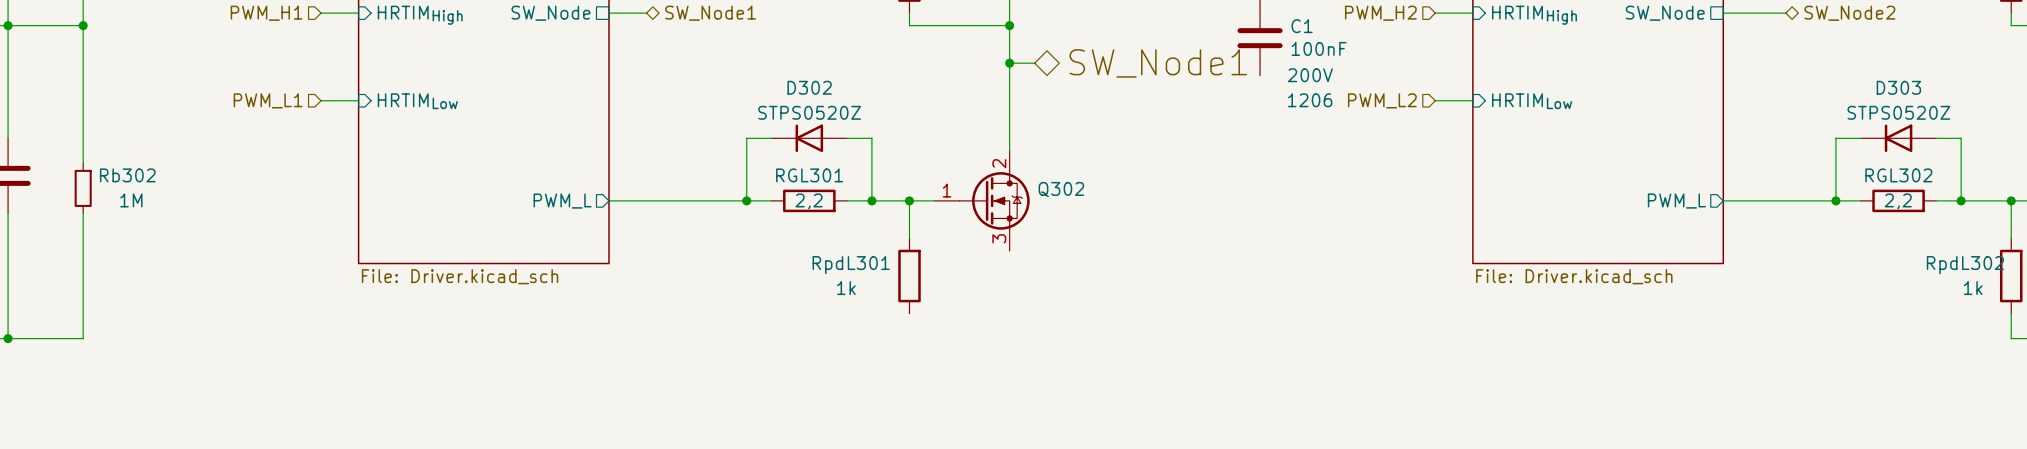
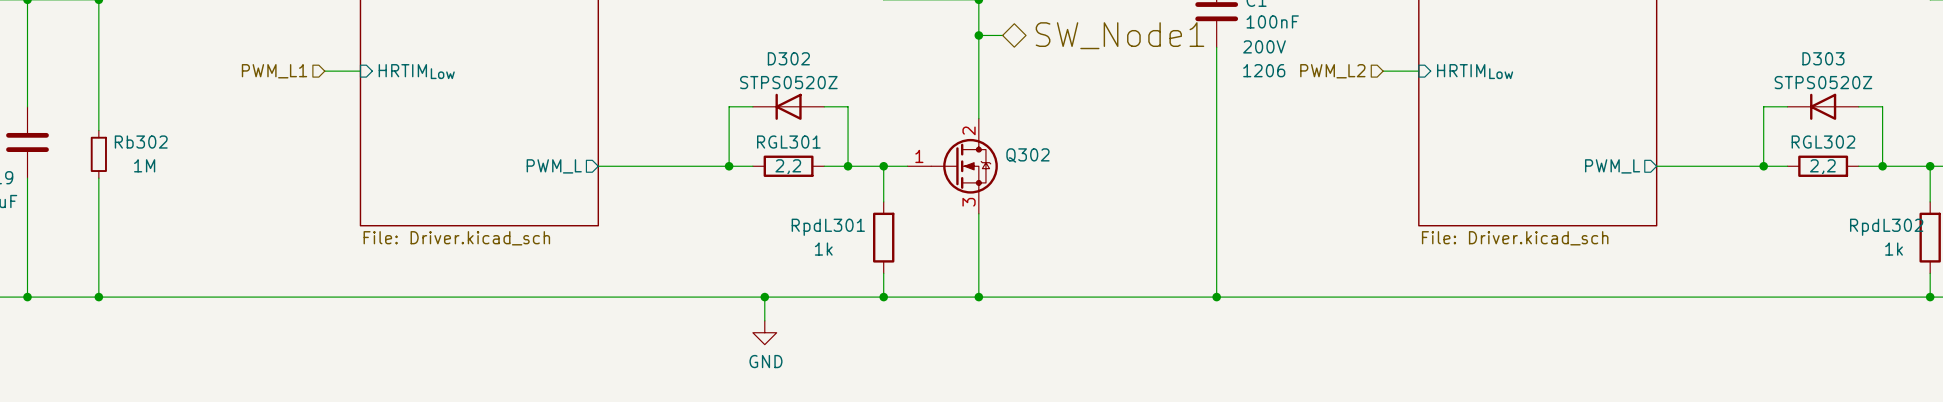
wire: none -> (1216, 47) (1216, 297)
wire: none -> (978, 213) (978, 297)
wire: none -> (883, 273) (883, 297)
wire: none -> (98, 297) (1930, 297)
junction: none -> (98, 297)
wire: none -> (764, 297) (764, 320)
junction: none -> (764, 297)
junction: none -> (883, 297)
junction: none -> (978, 297)
junction: none -> (1216, 297)
junction: none -> (1930, 297)
power symbol: none -> GND (764, 332)

